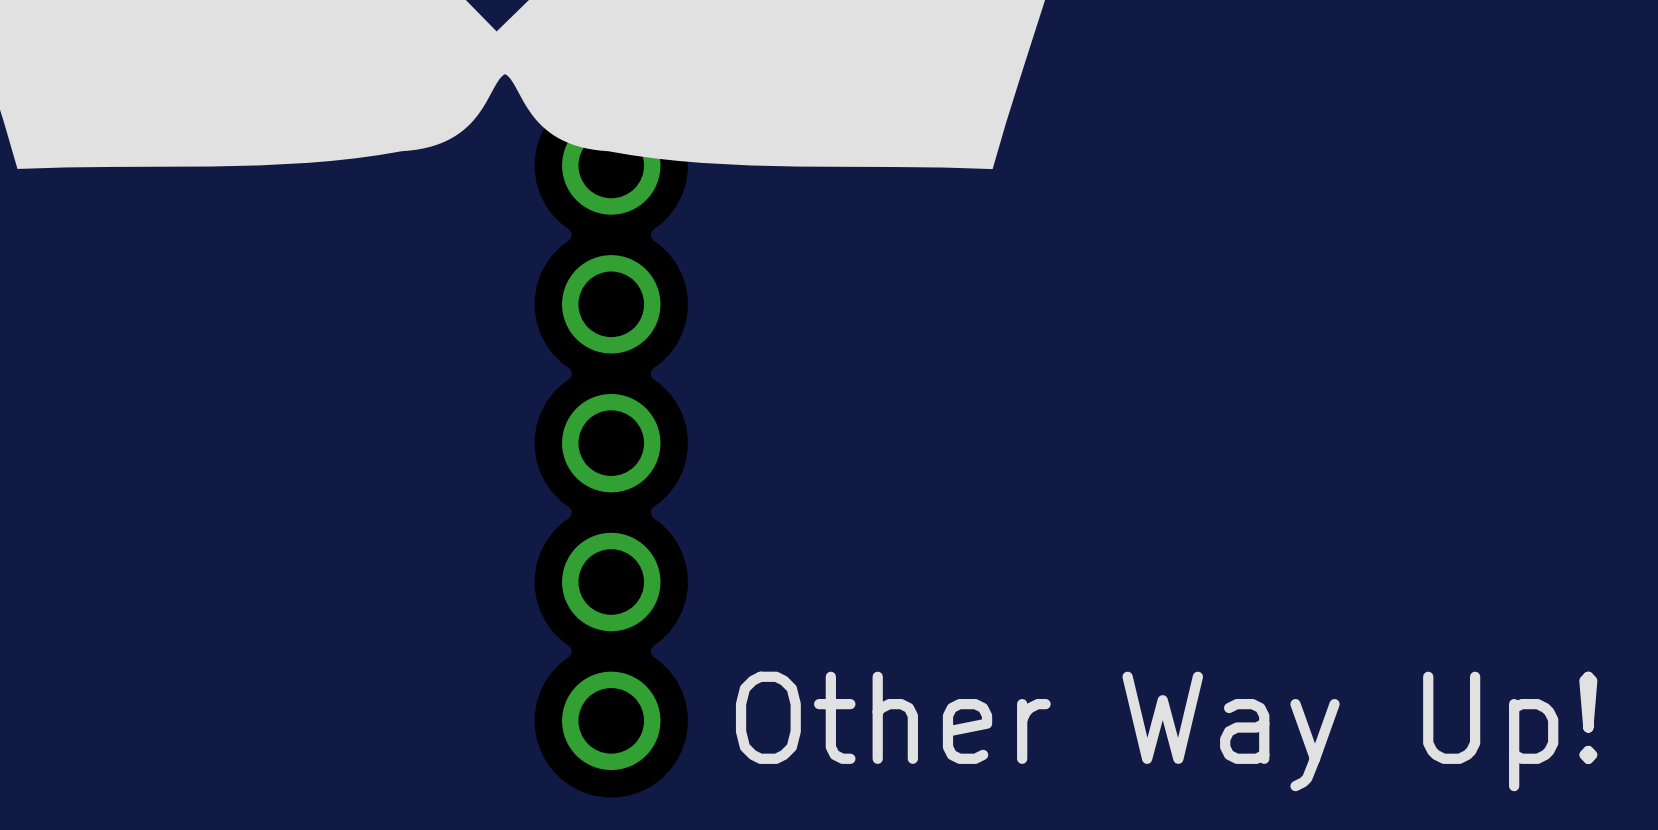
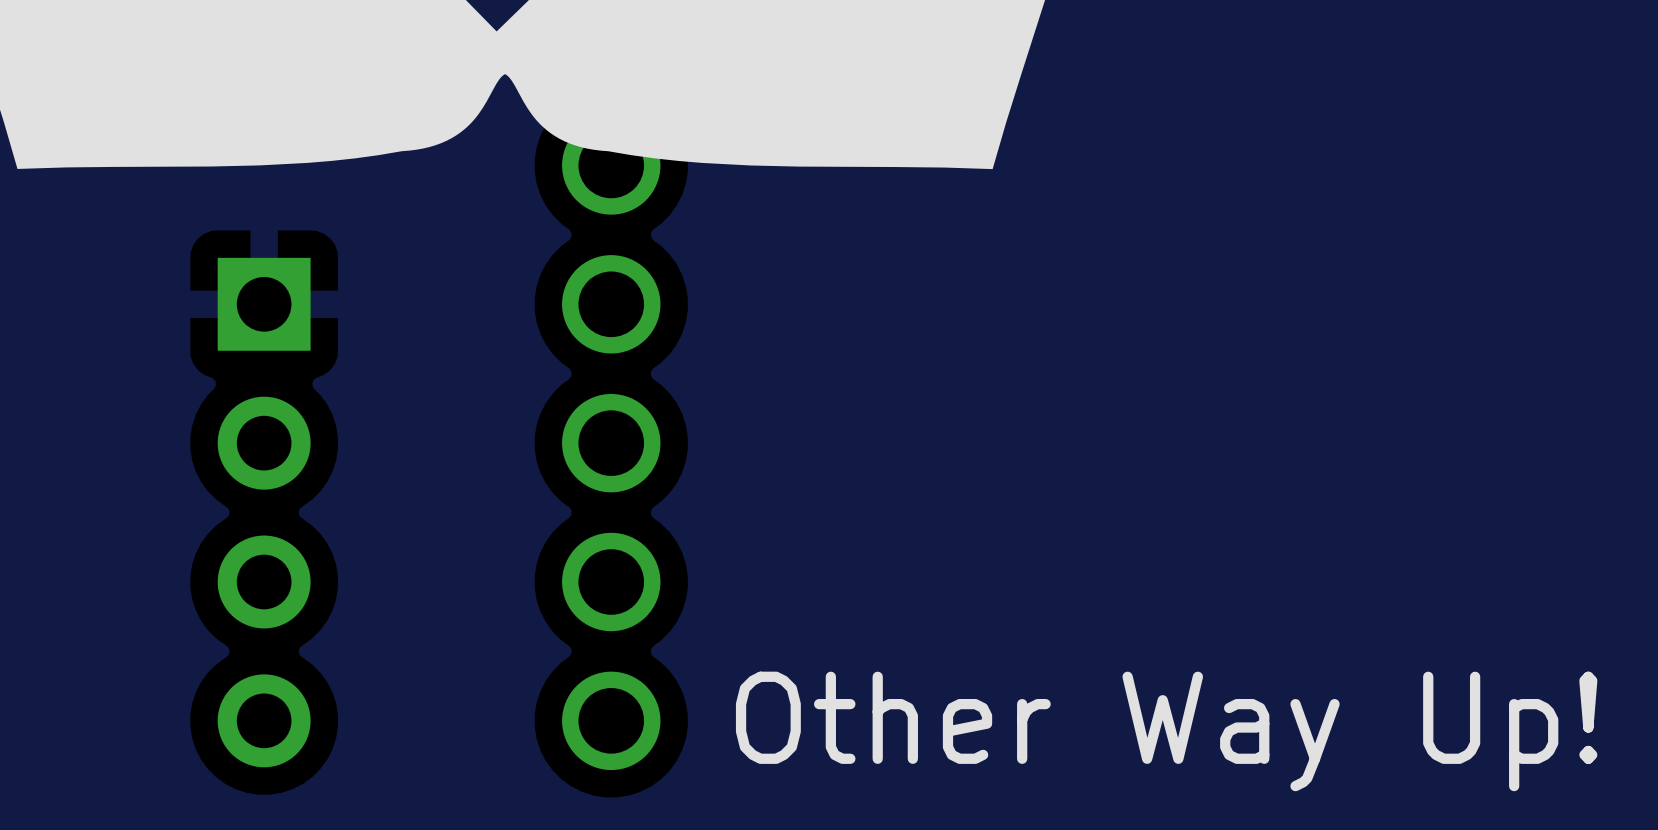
part: none -> (264, 512)

